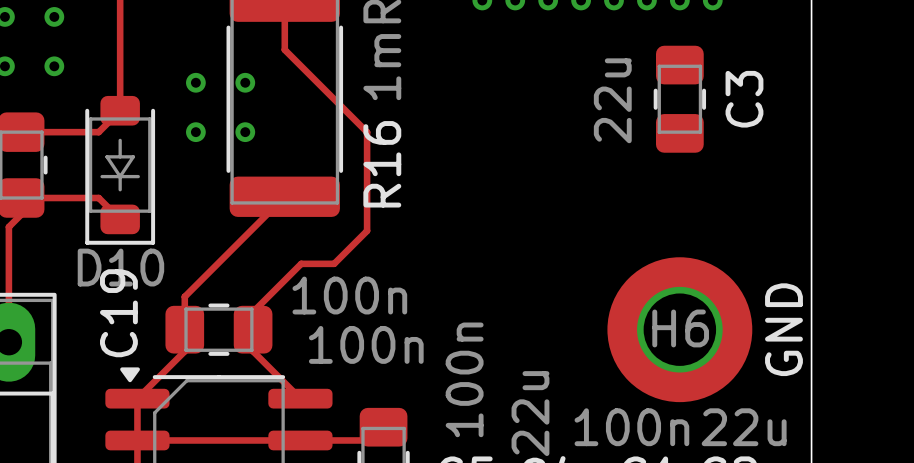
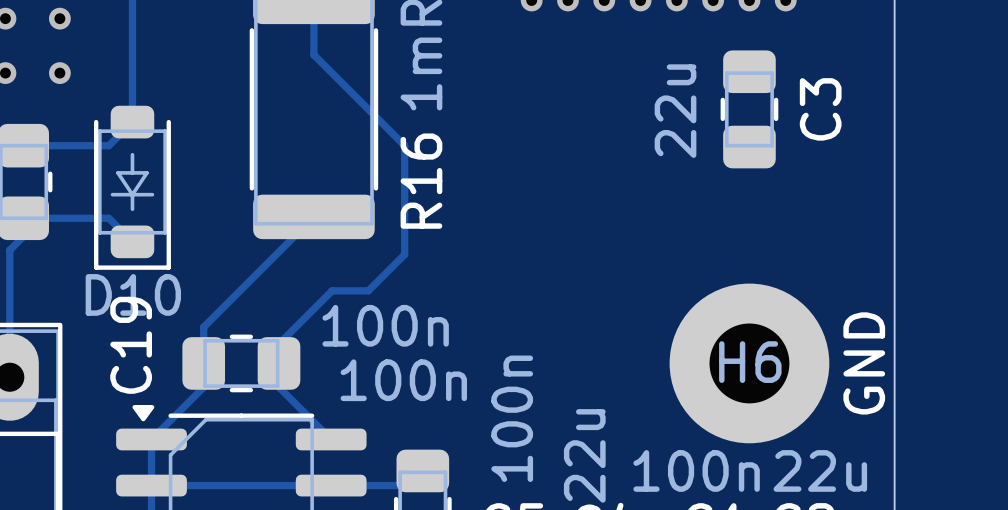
via: (195, 82) -> none
via: (245, 82) -> none
via: (195, 132) -> none
via: (245, 132) -> none

